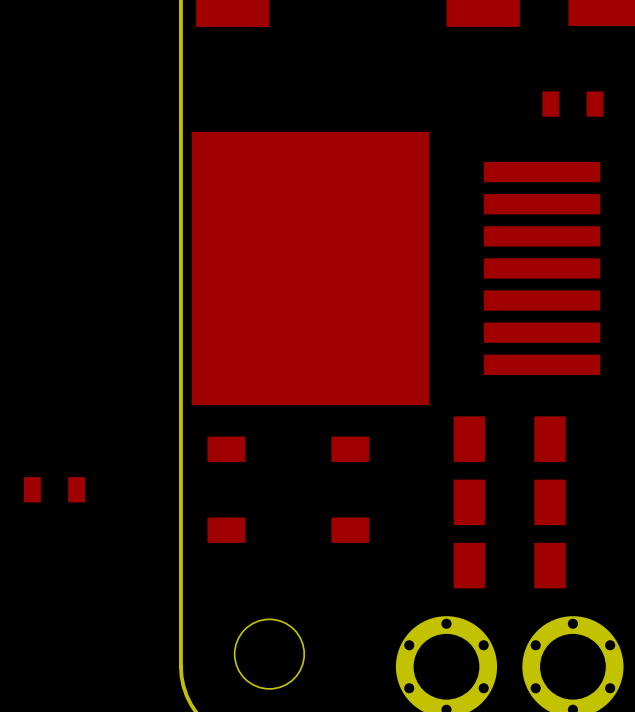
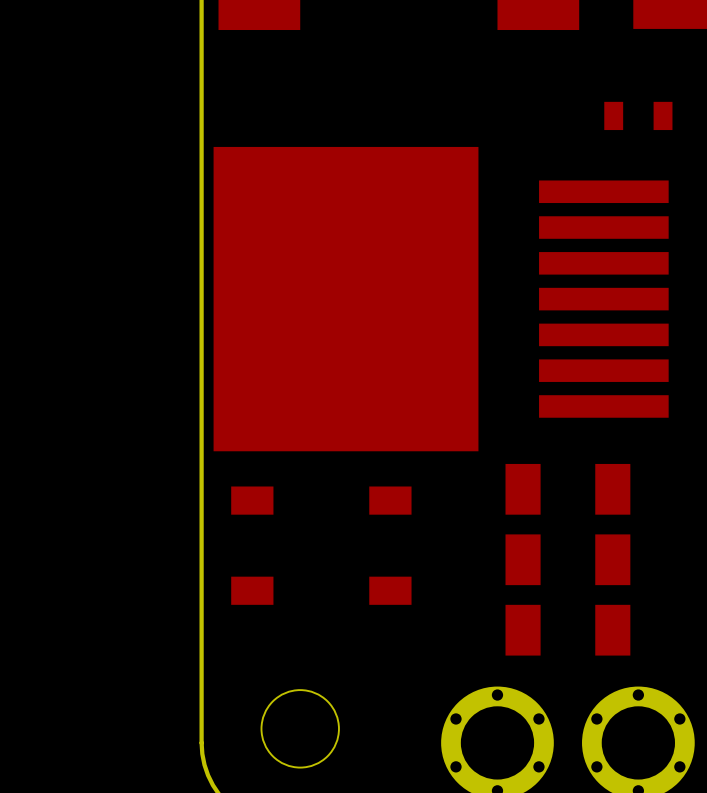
part: (54, 489) -> none

